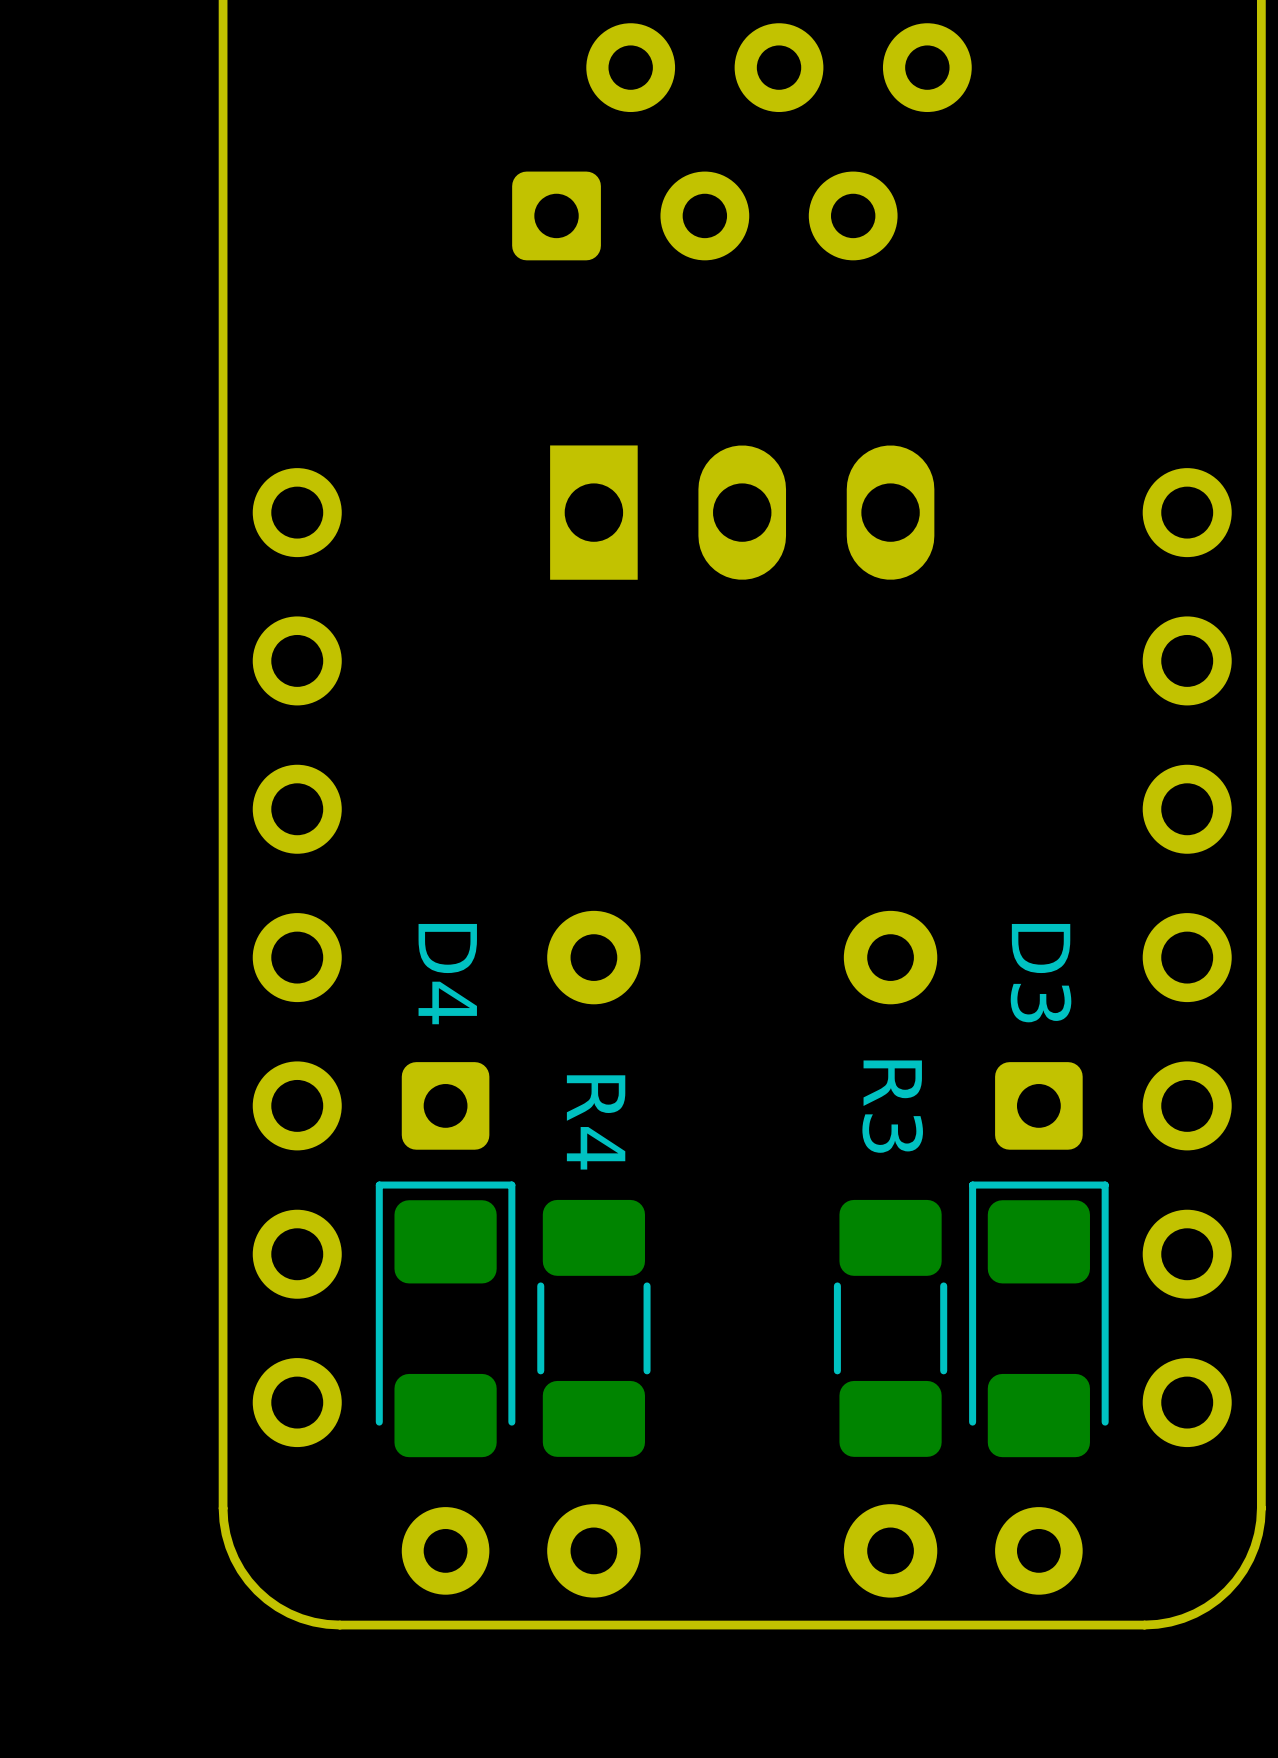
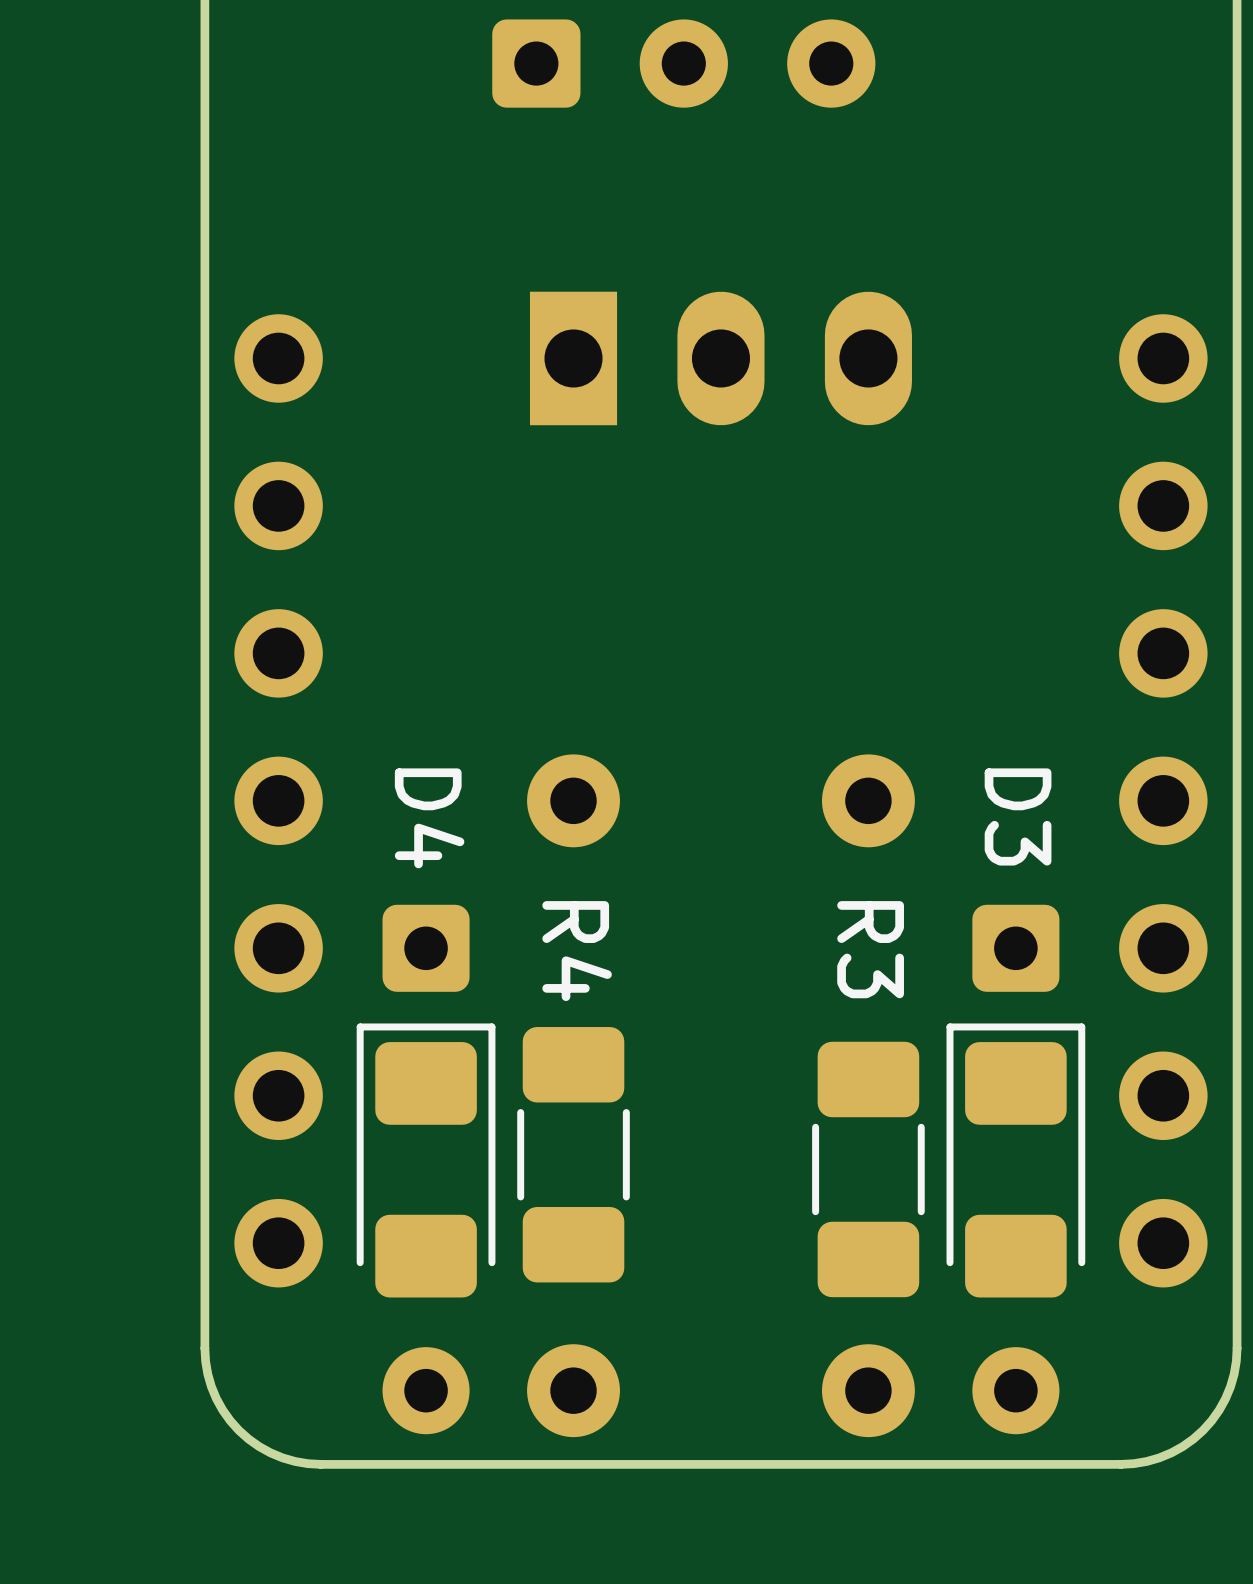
R4 position: (593, 1328) -> (573, 1154)

